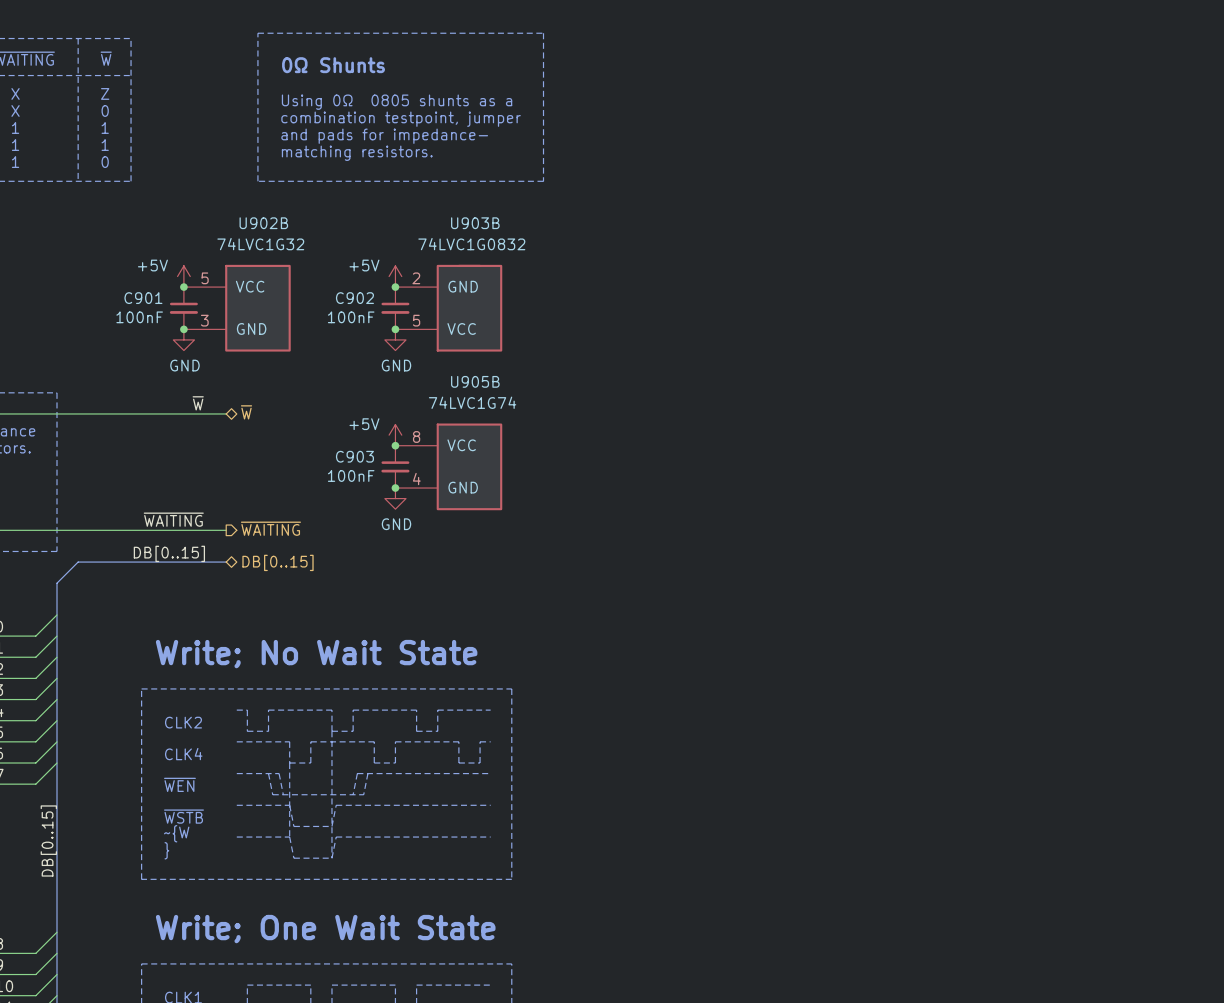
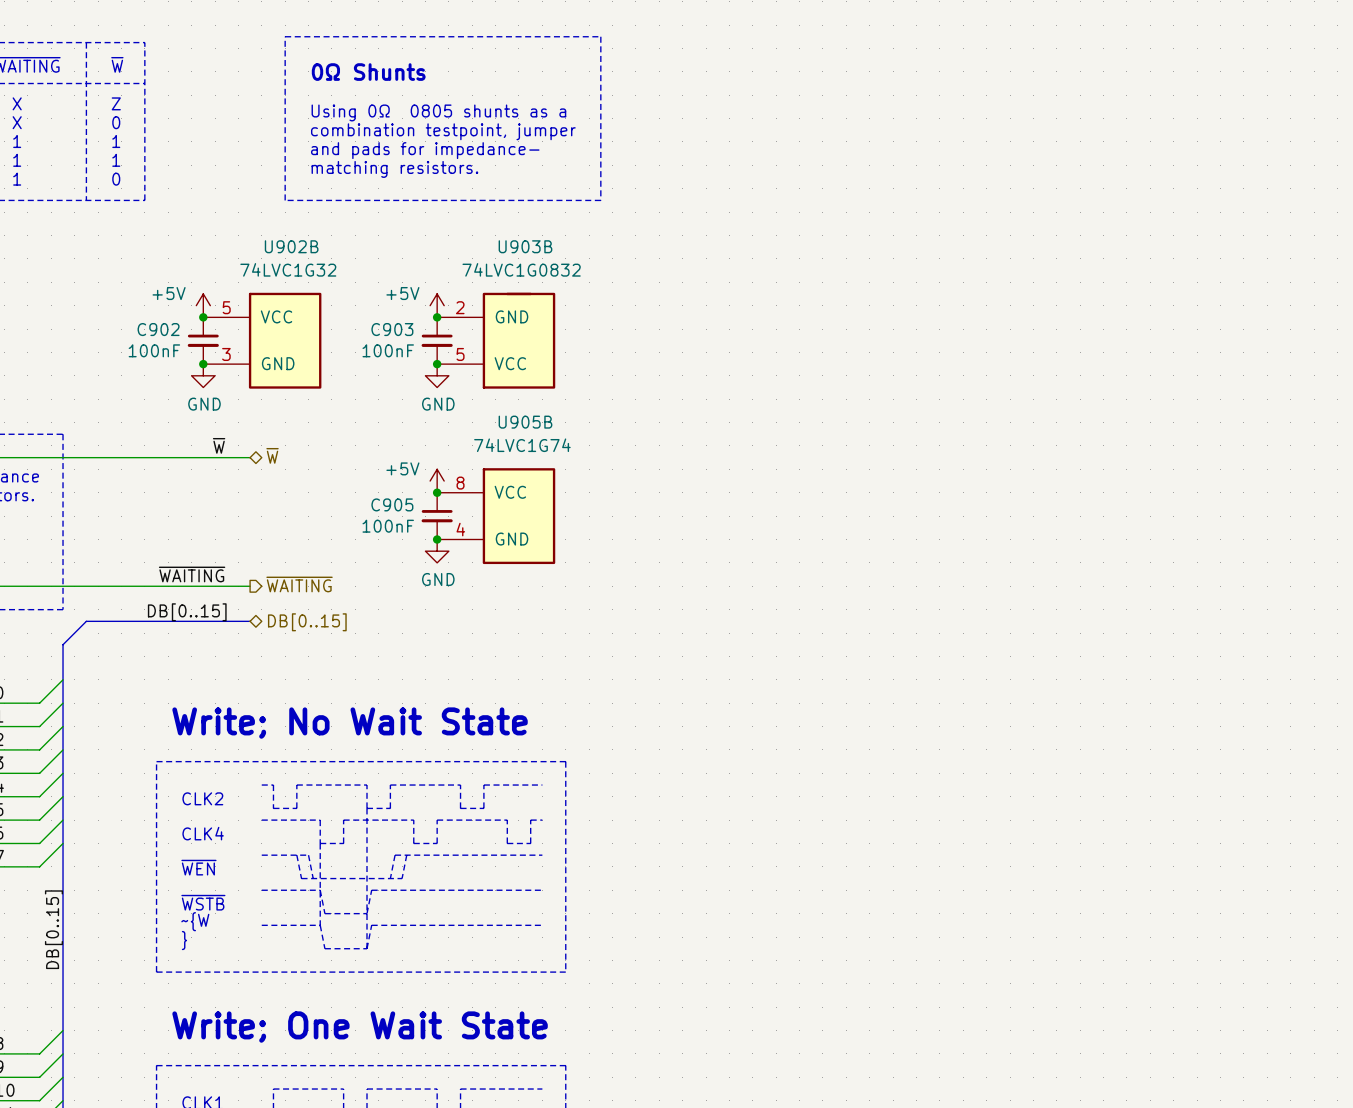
C901 name: C901 (143, 298) -> C902 (158, 329)
C902 name: C902 (354, 298) -> C903 (392, 329)
C903 name: C903 (354, 456) -> C905 (392, 504)

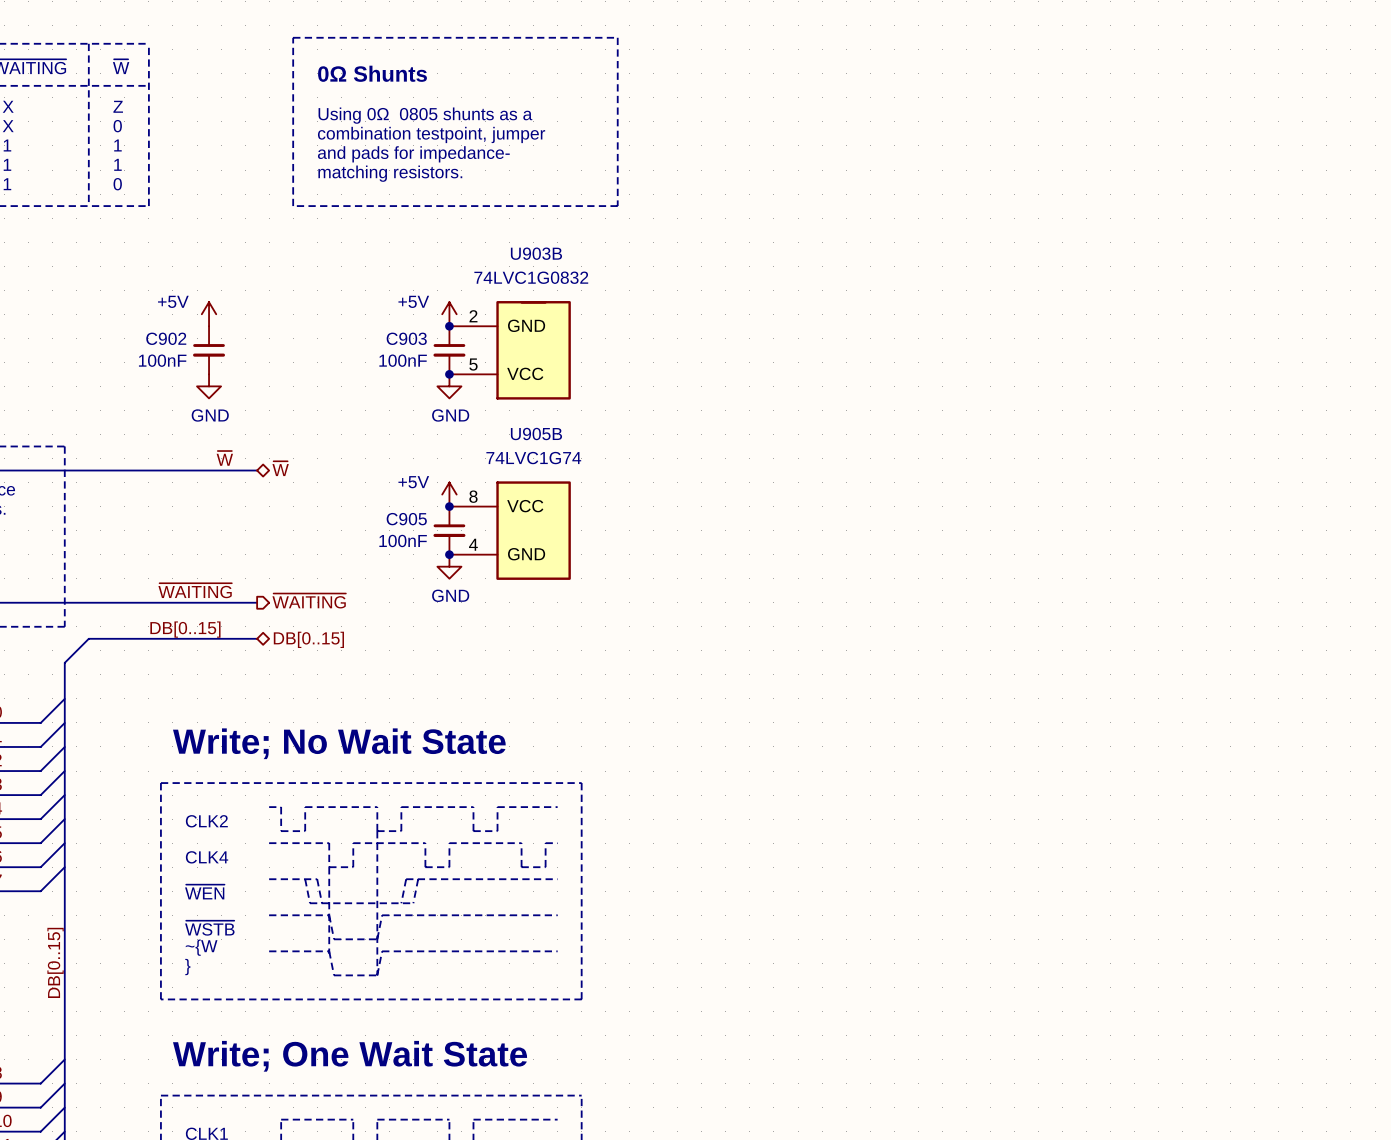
junction: (203, 317) -> none
U902B: 74LVC1G32 (262, 340) -> none
junction: (203, 364) -> none

